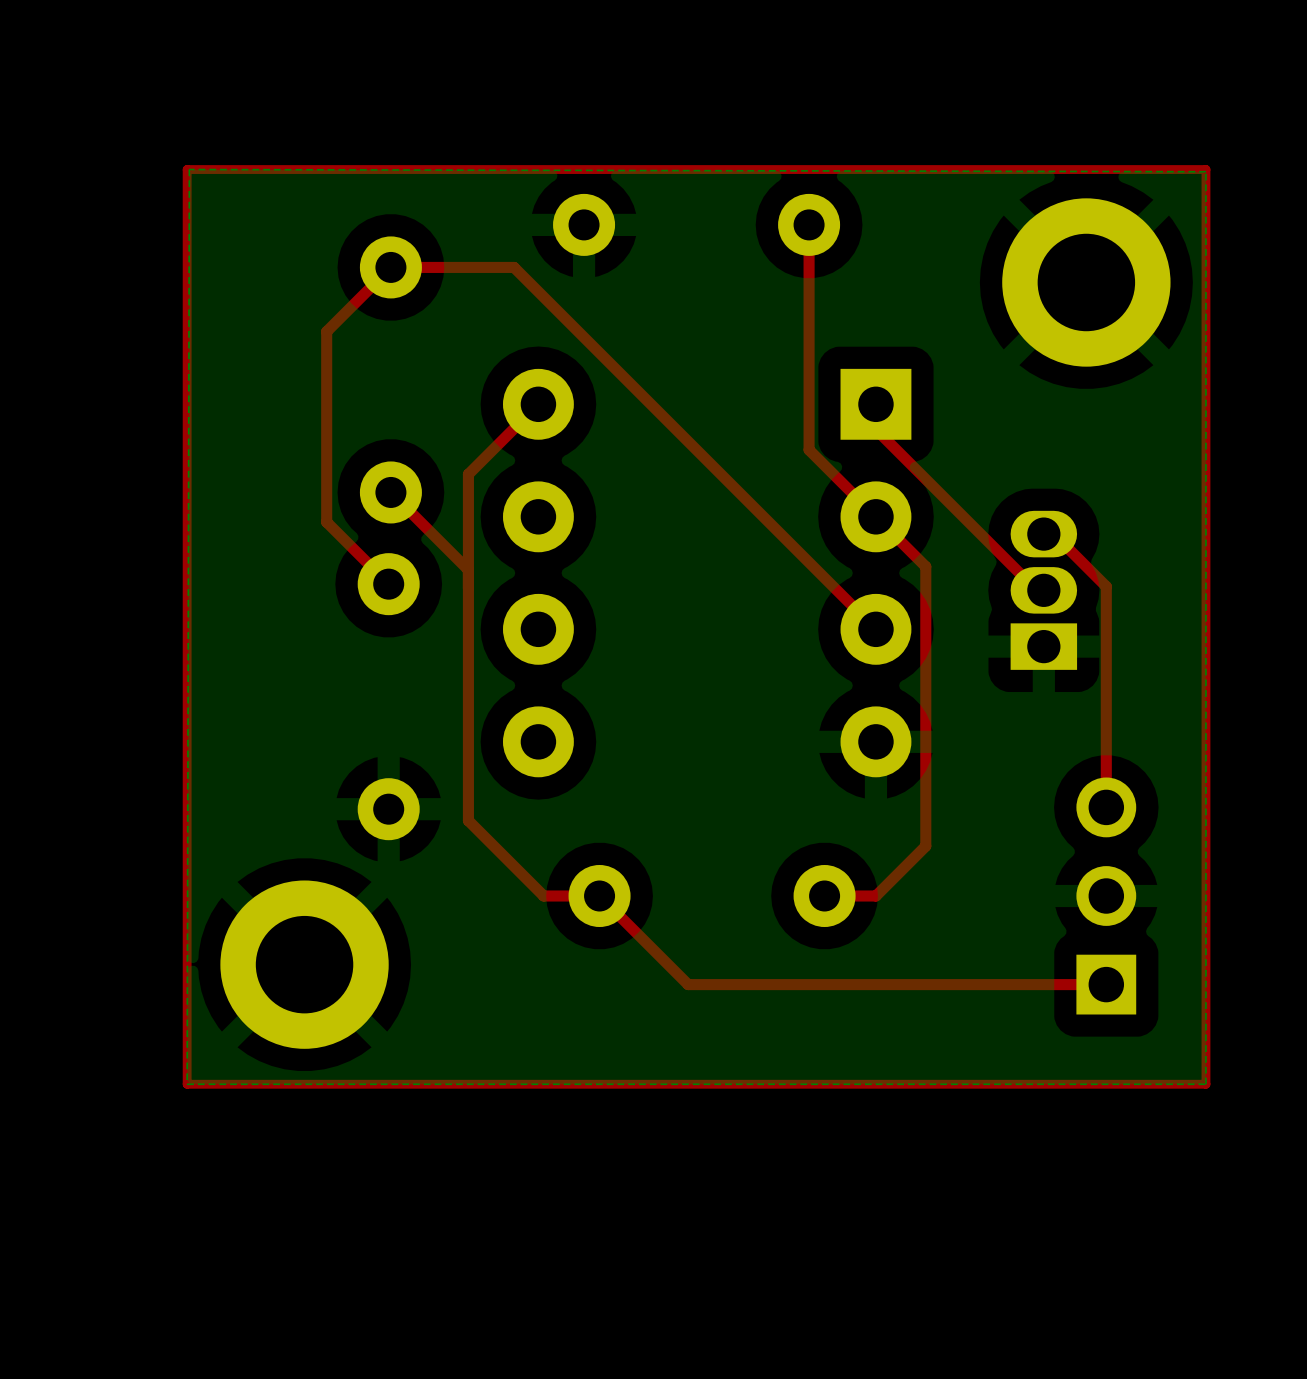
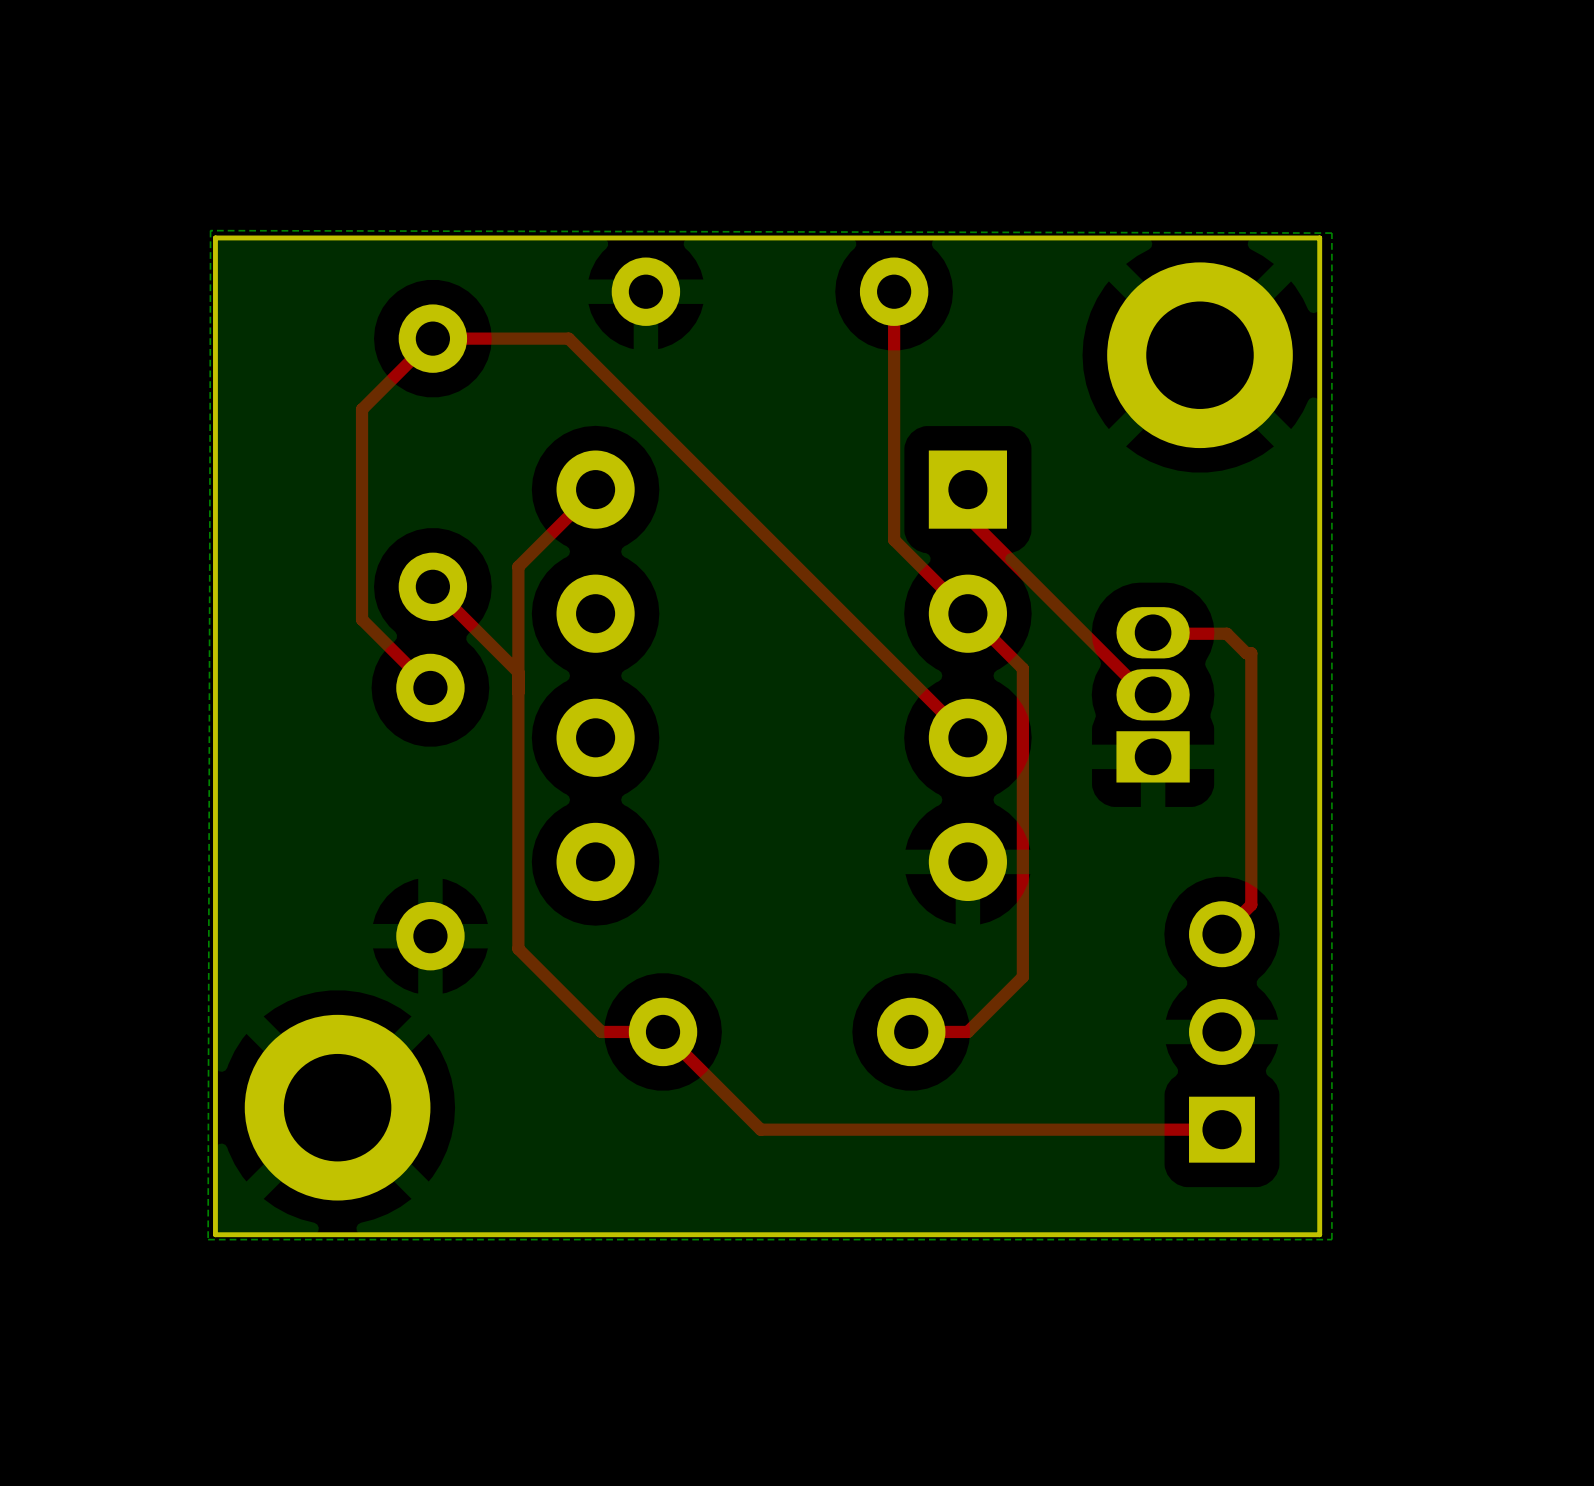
top track: (1205, 169) (187, 169) (187, 1084) (1205, 1084) (1205, 169) -> none
board edge: none -> (1319, 237) (215, 237) (215, 1234) (1319, 1234) (1319, 237)
top track: (1054, 534) (1106, 586) (1106, 807) -> (1165, 633) (1226, 633) (1246, 653) (1251, 653) (1251, 904) (1221, 934)

